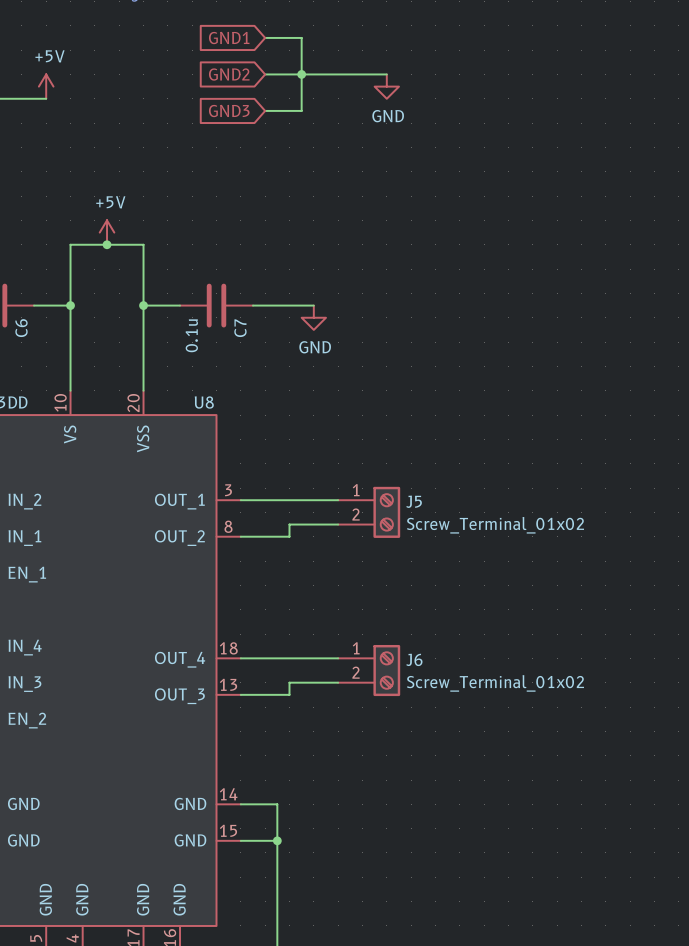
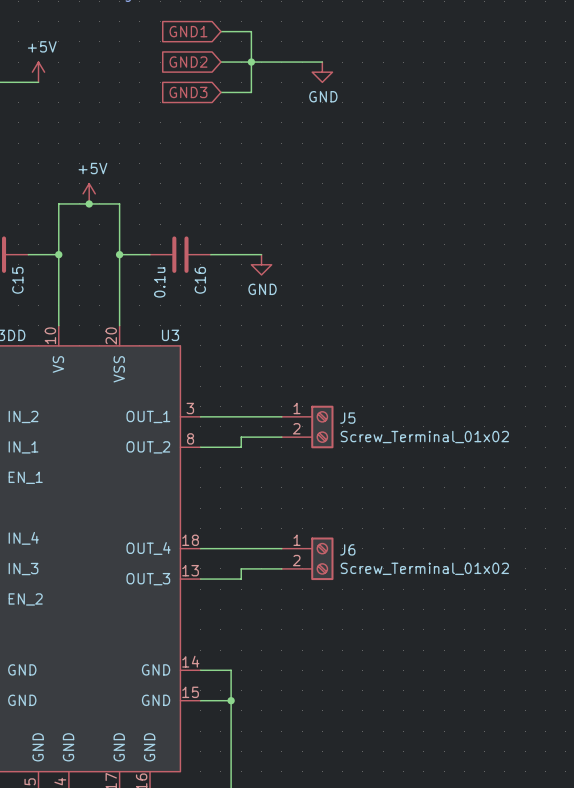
C6 name: C6 (21, 328) -> C15 (17, 280)
C7 name: C7 (240, 328) -> C16 (200, 280)
U8 name: U8 (204, 402) -> U3 (170, 335)

